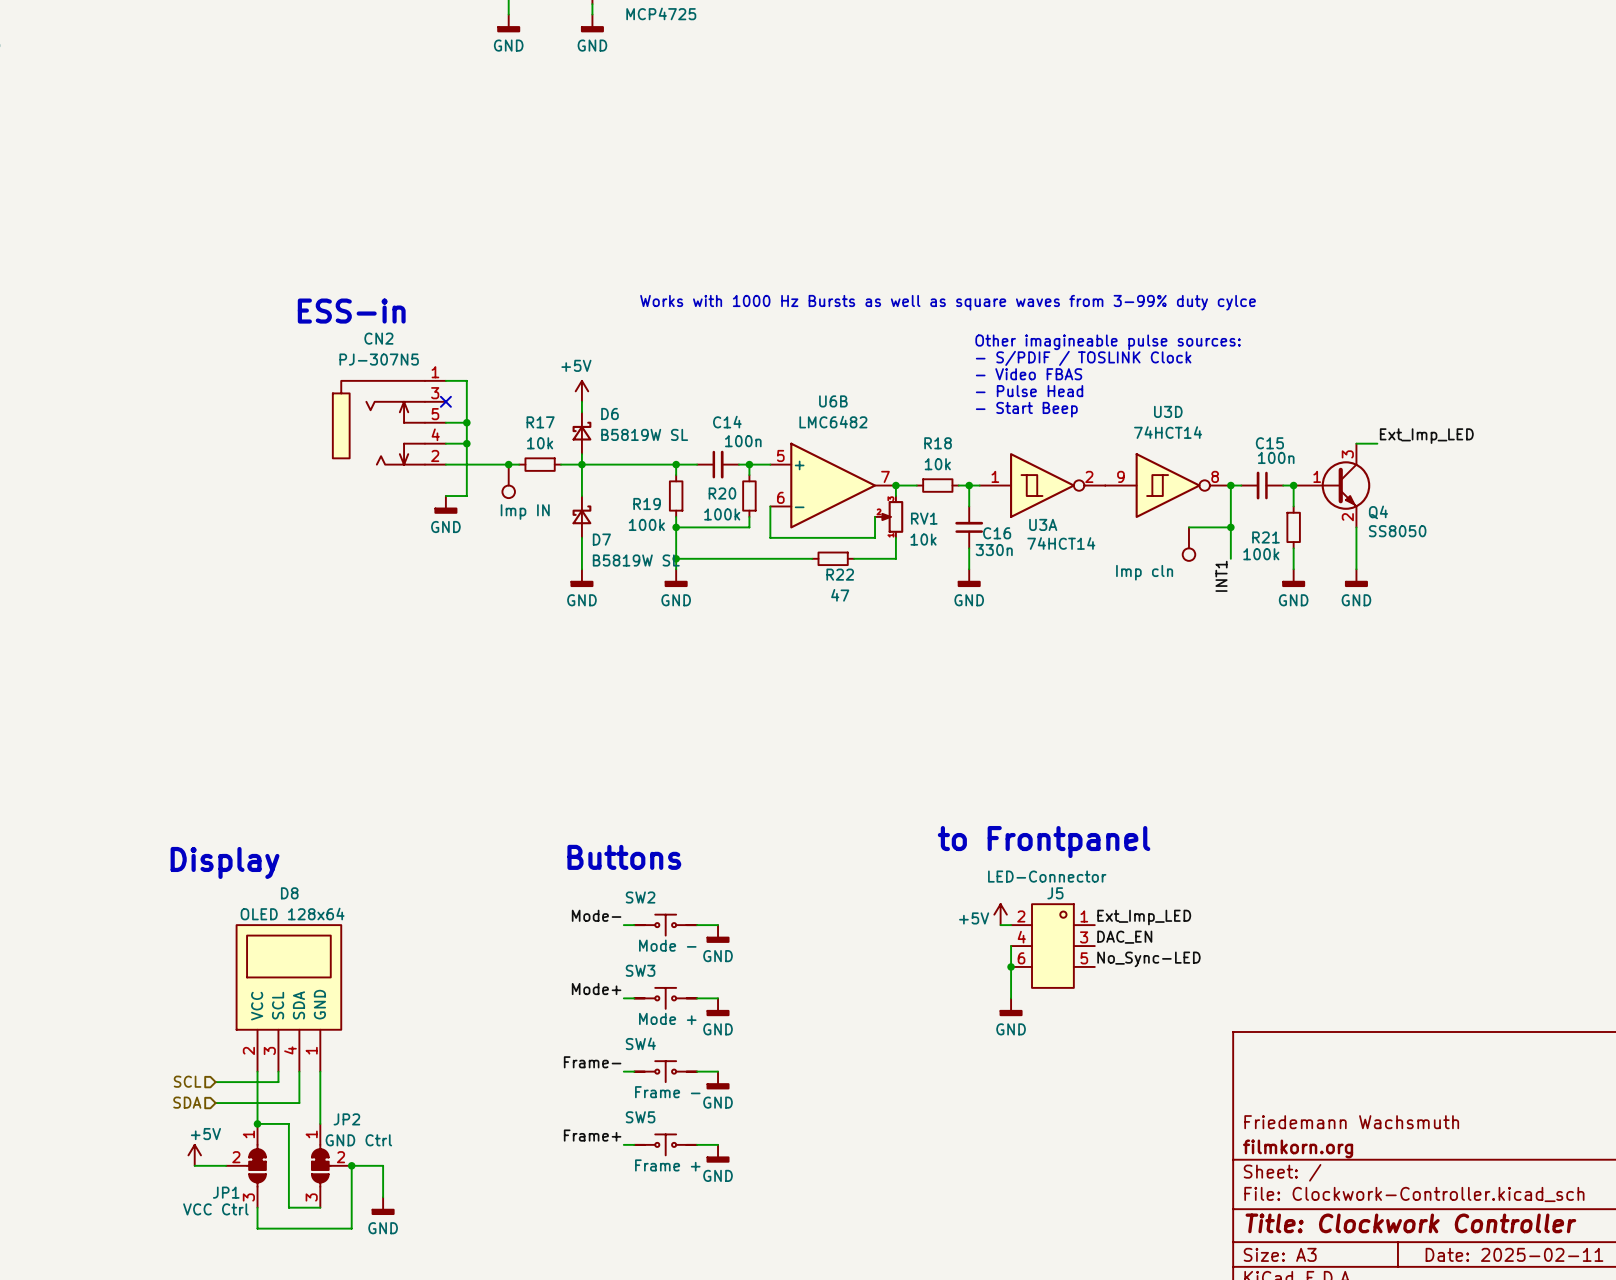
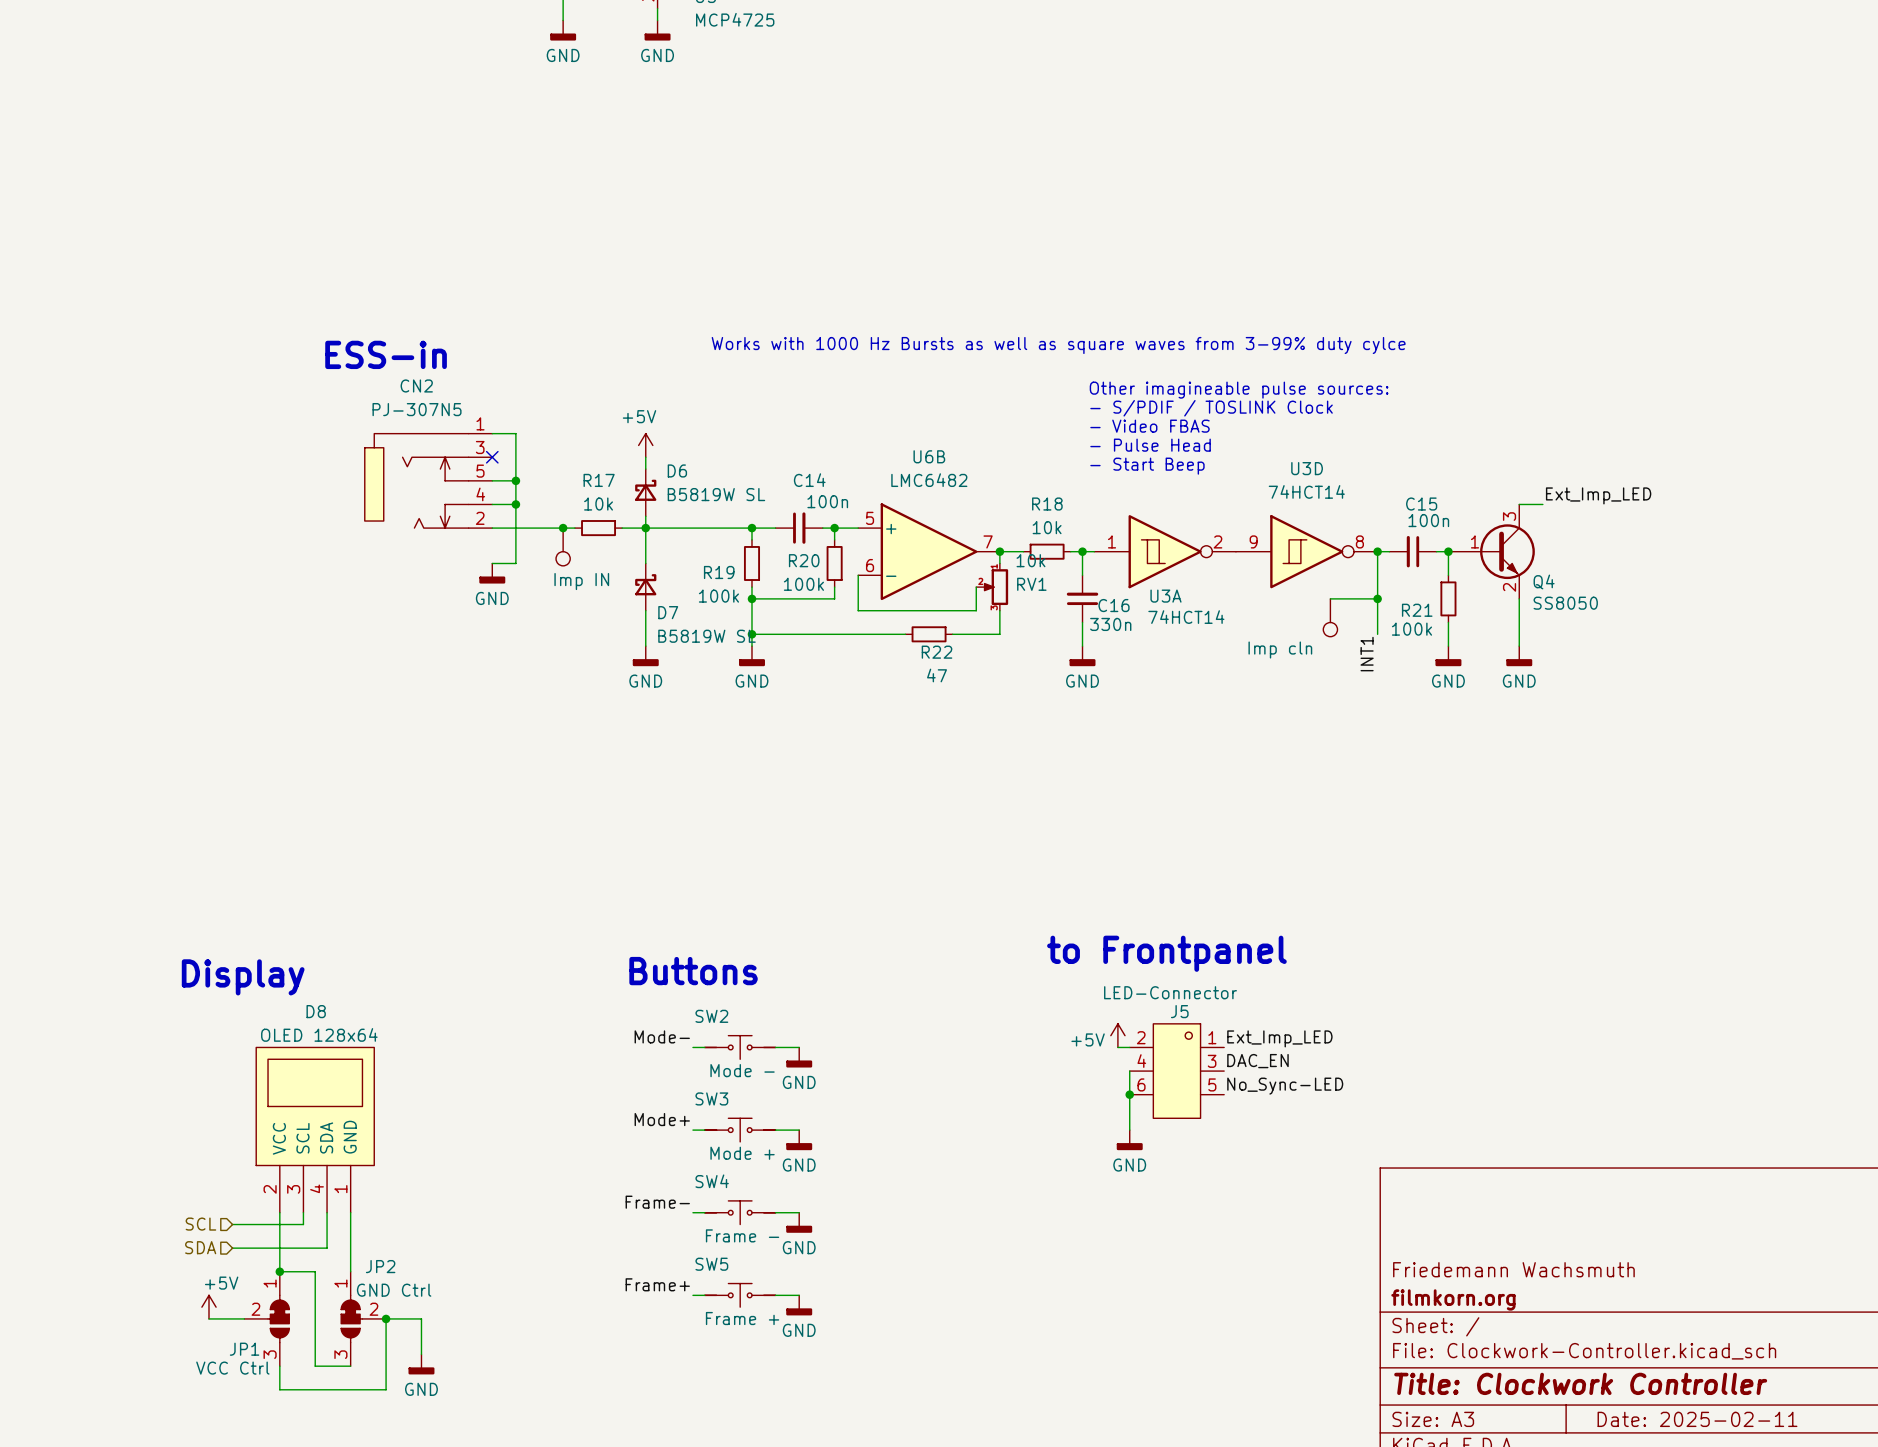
RV1 flip: as is (892, 516) -> up-down (996, 587)

